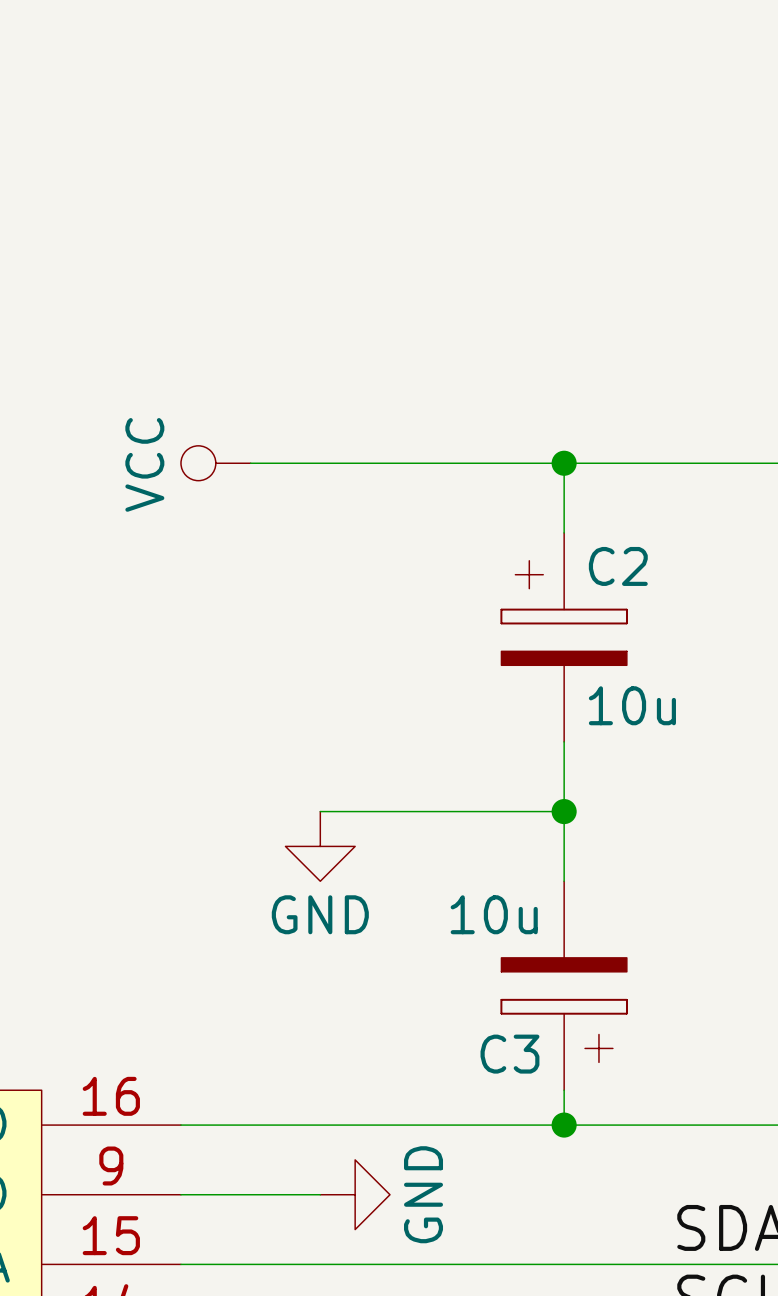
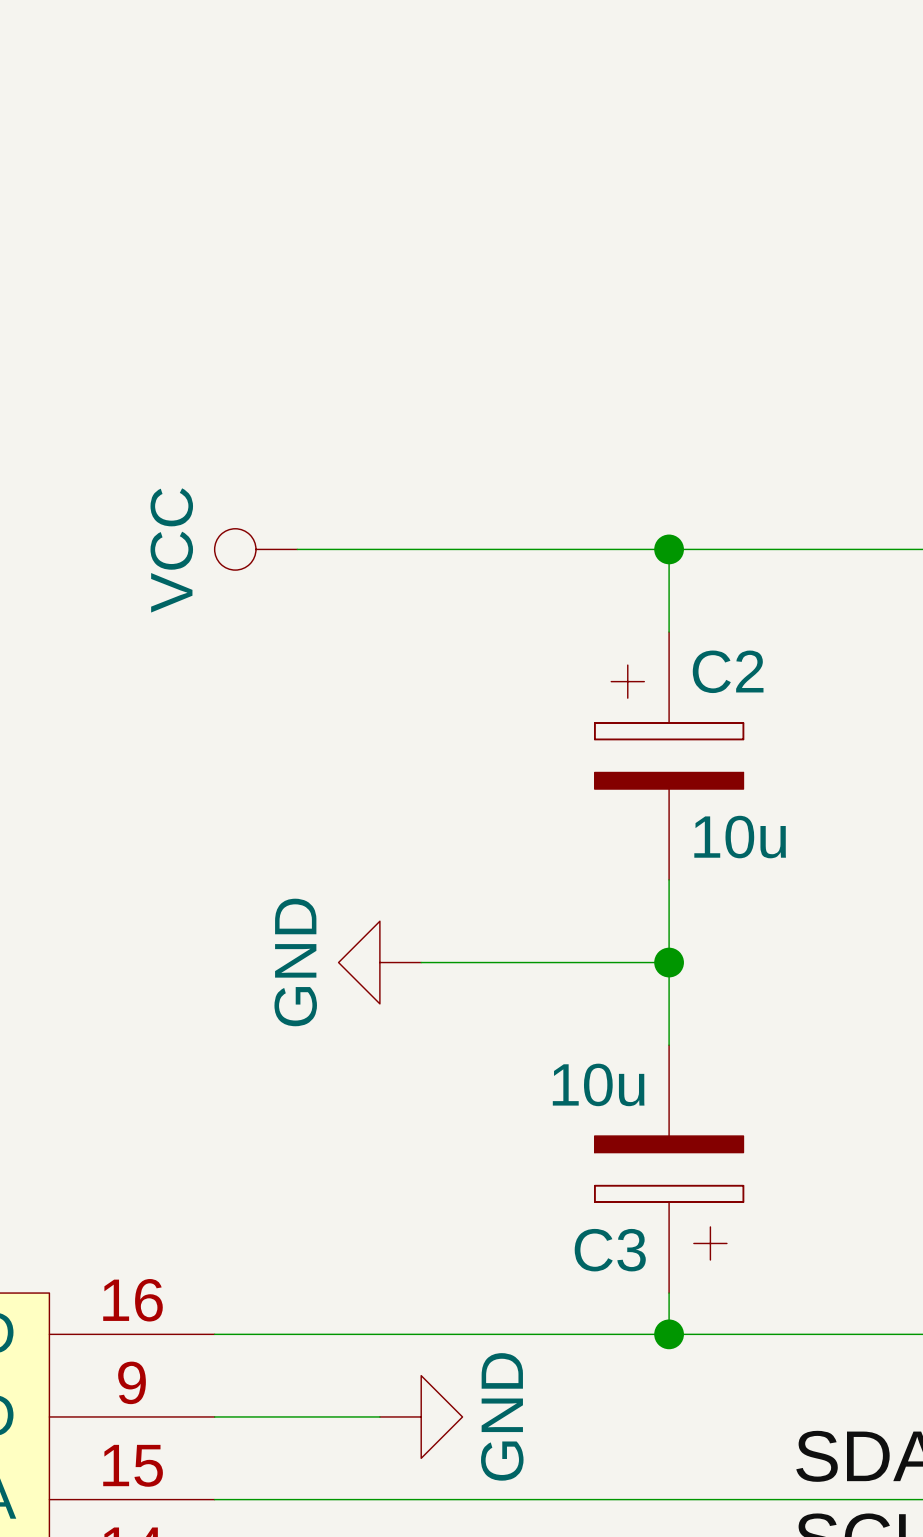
power symbol rotation: 0° (320, 846) -> 90° clockwise (379, 962)

